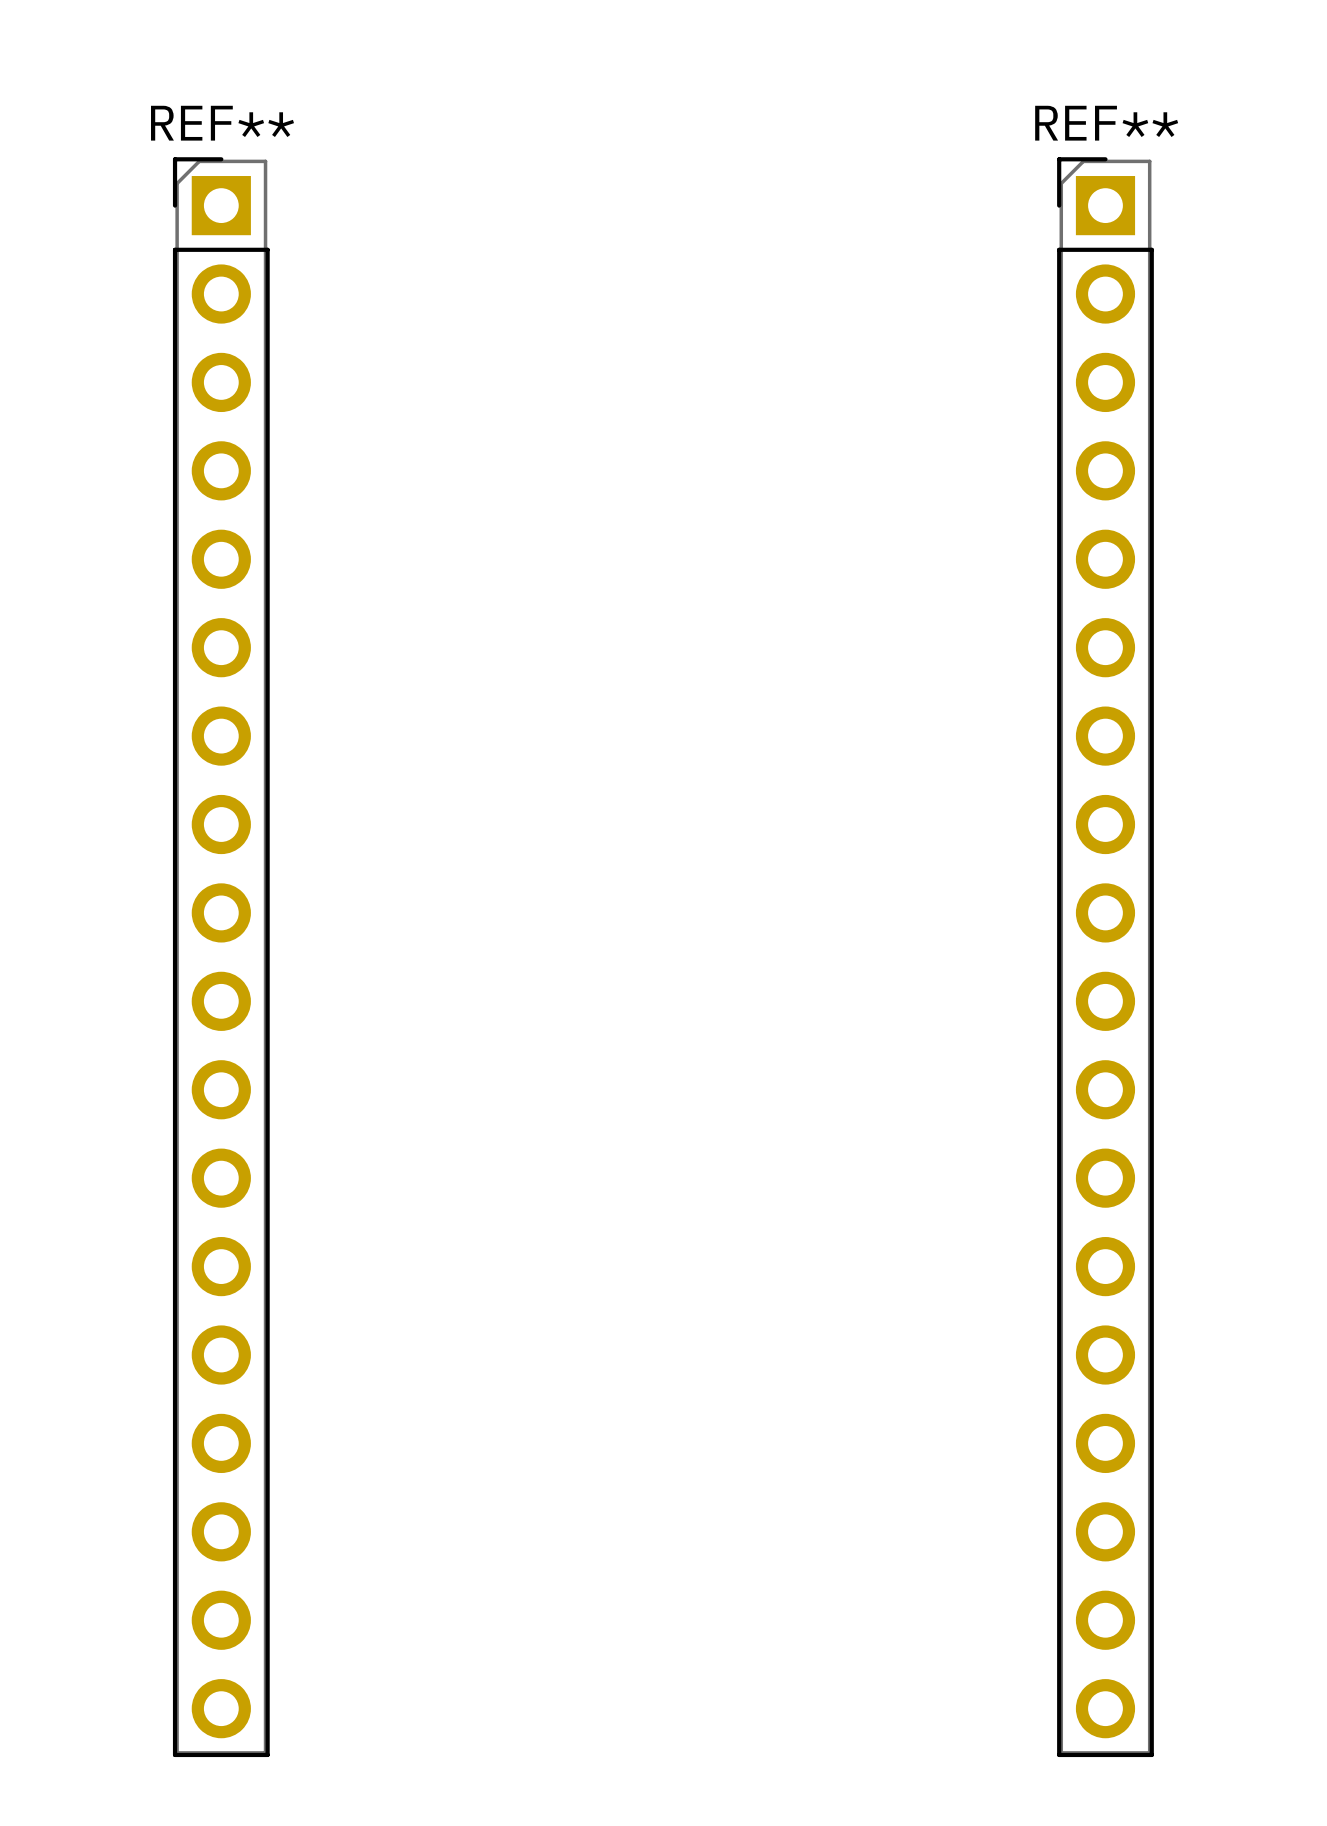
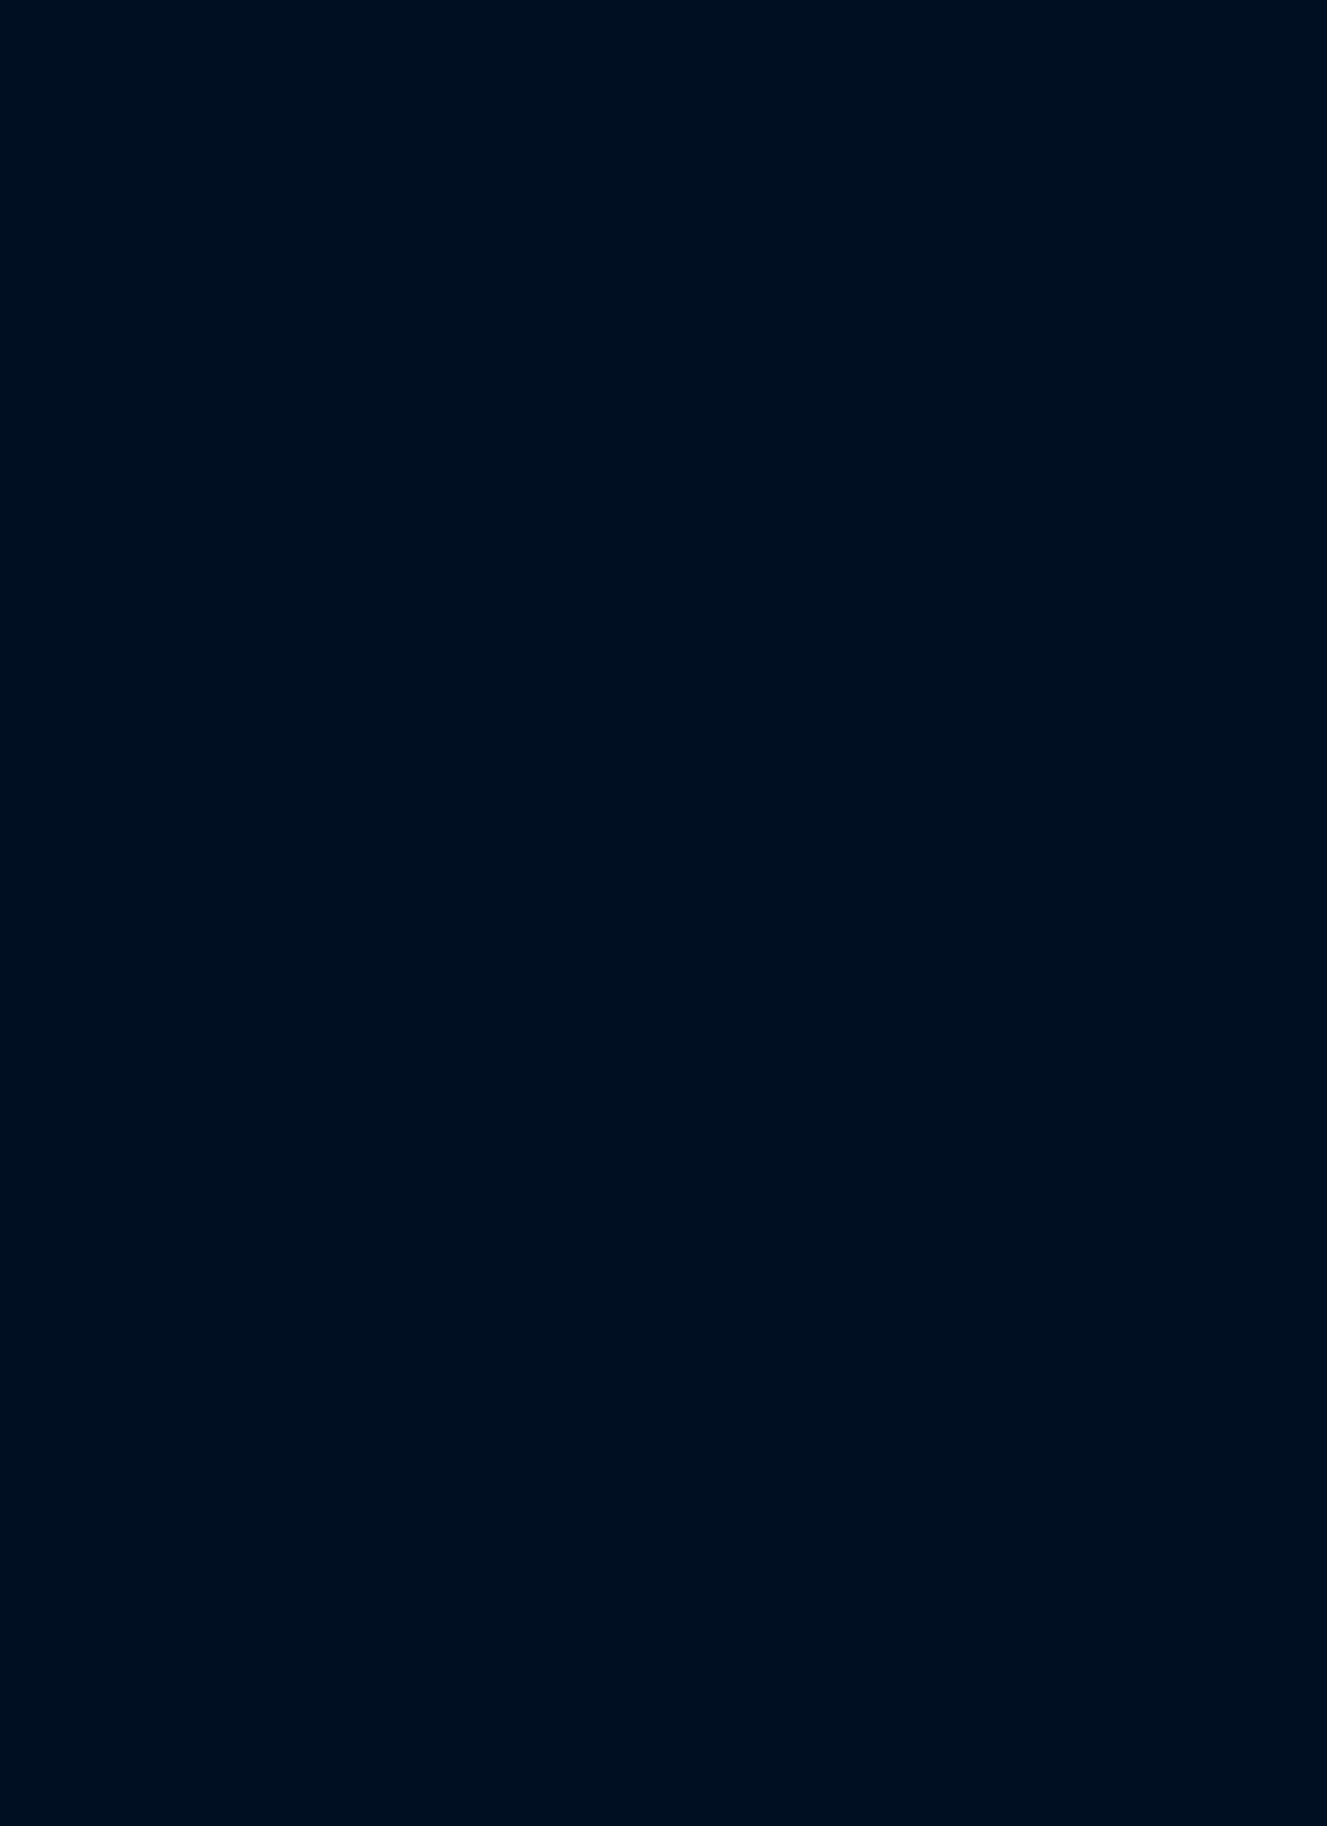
REF**: (221, 957) -> none
REF**: (1105, 957) -> none

